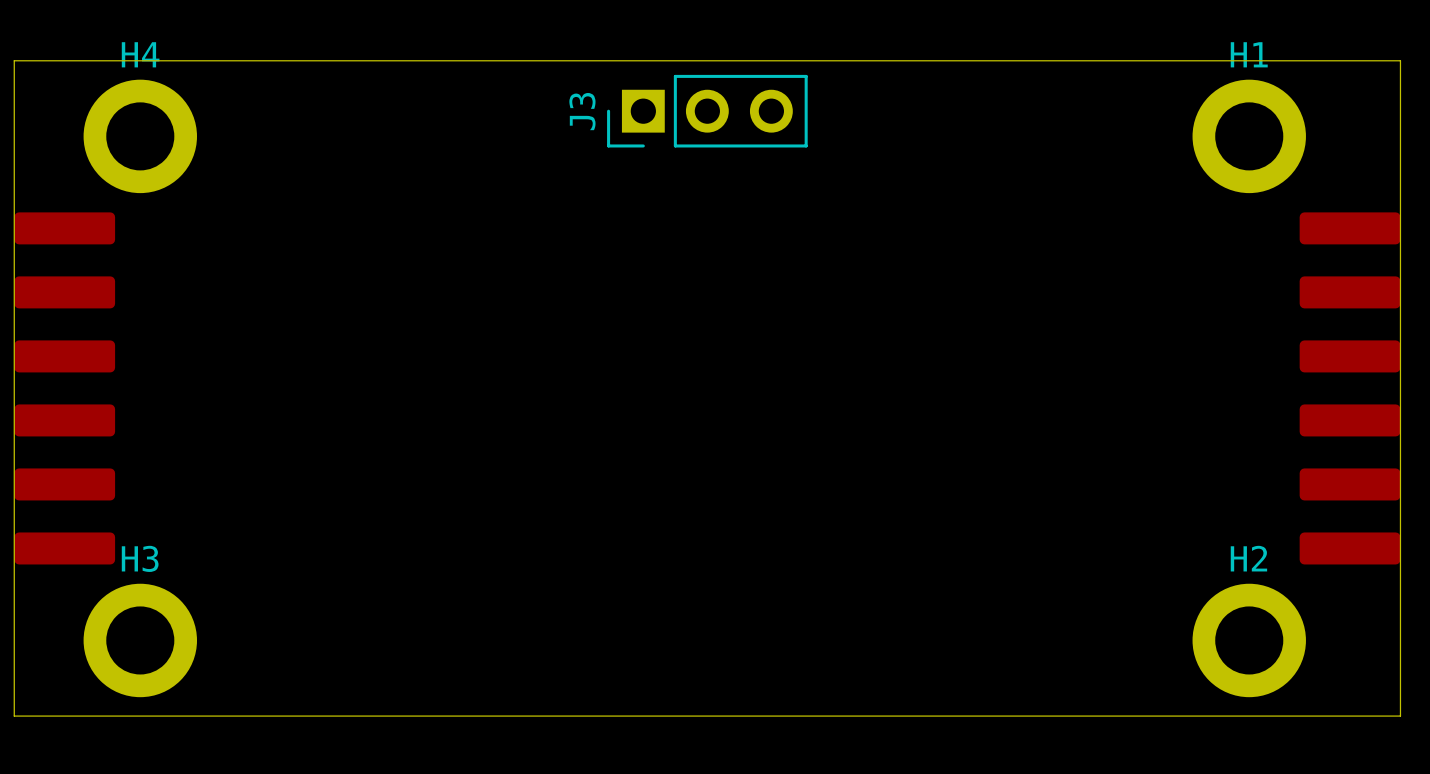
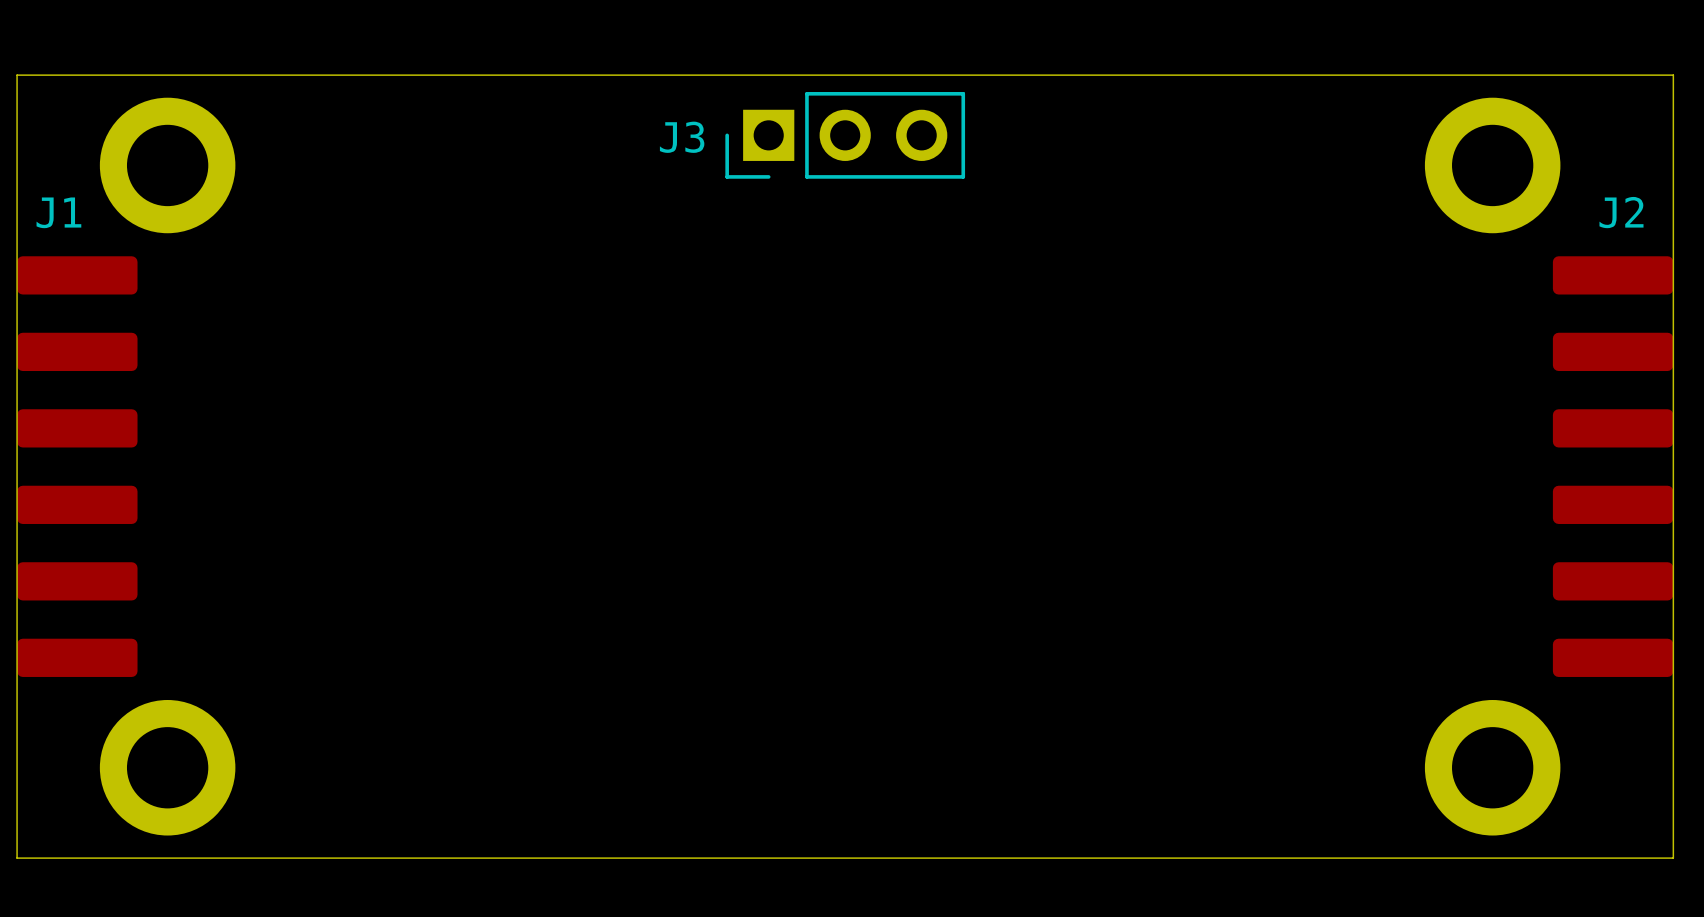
H4 name: H4 (140, 54) -> none
H1 name: H1 (1249, 54) -> none
J3 name rotation: 0° (582, 111) -> 90° clockwise (682, 137)
J2 name: none -> J2 (1621, 212)
J1 name: none -> J1 (58, 212)
H3 name: H3 (140, 558) -> none
H2 name: H2 (1248, 558) -> none

